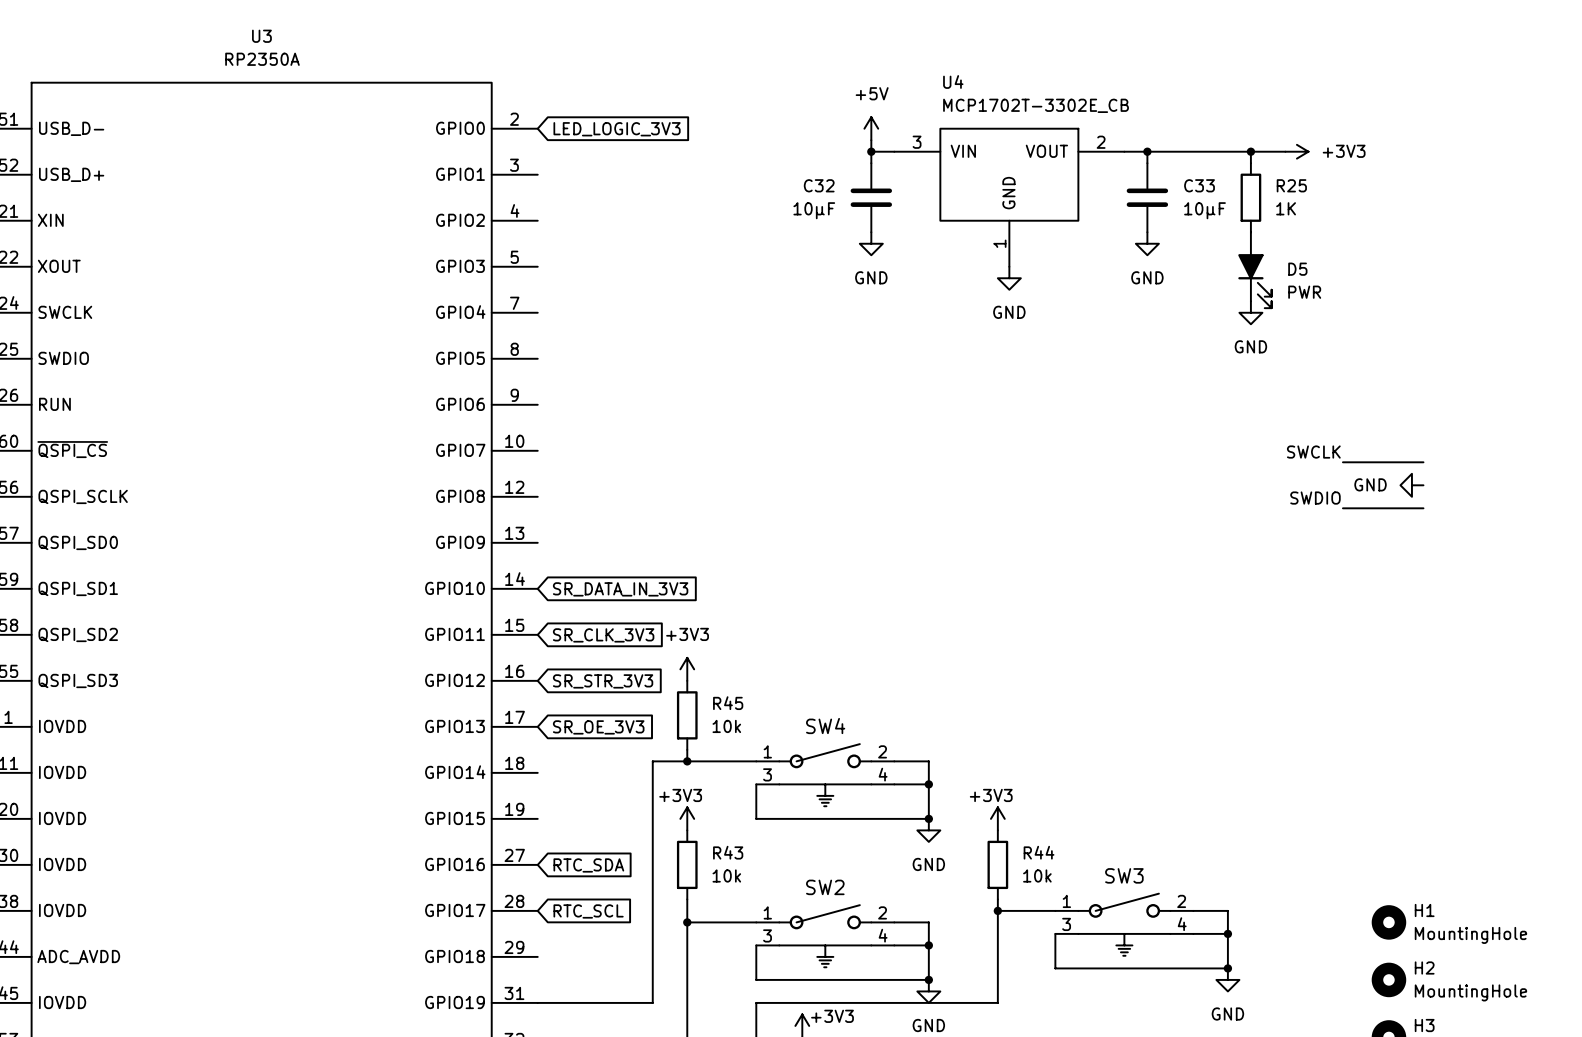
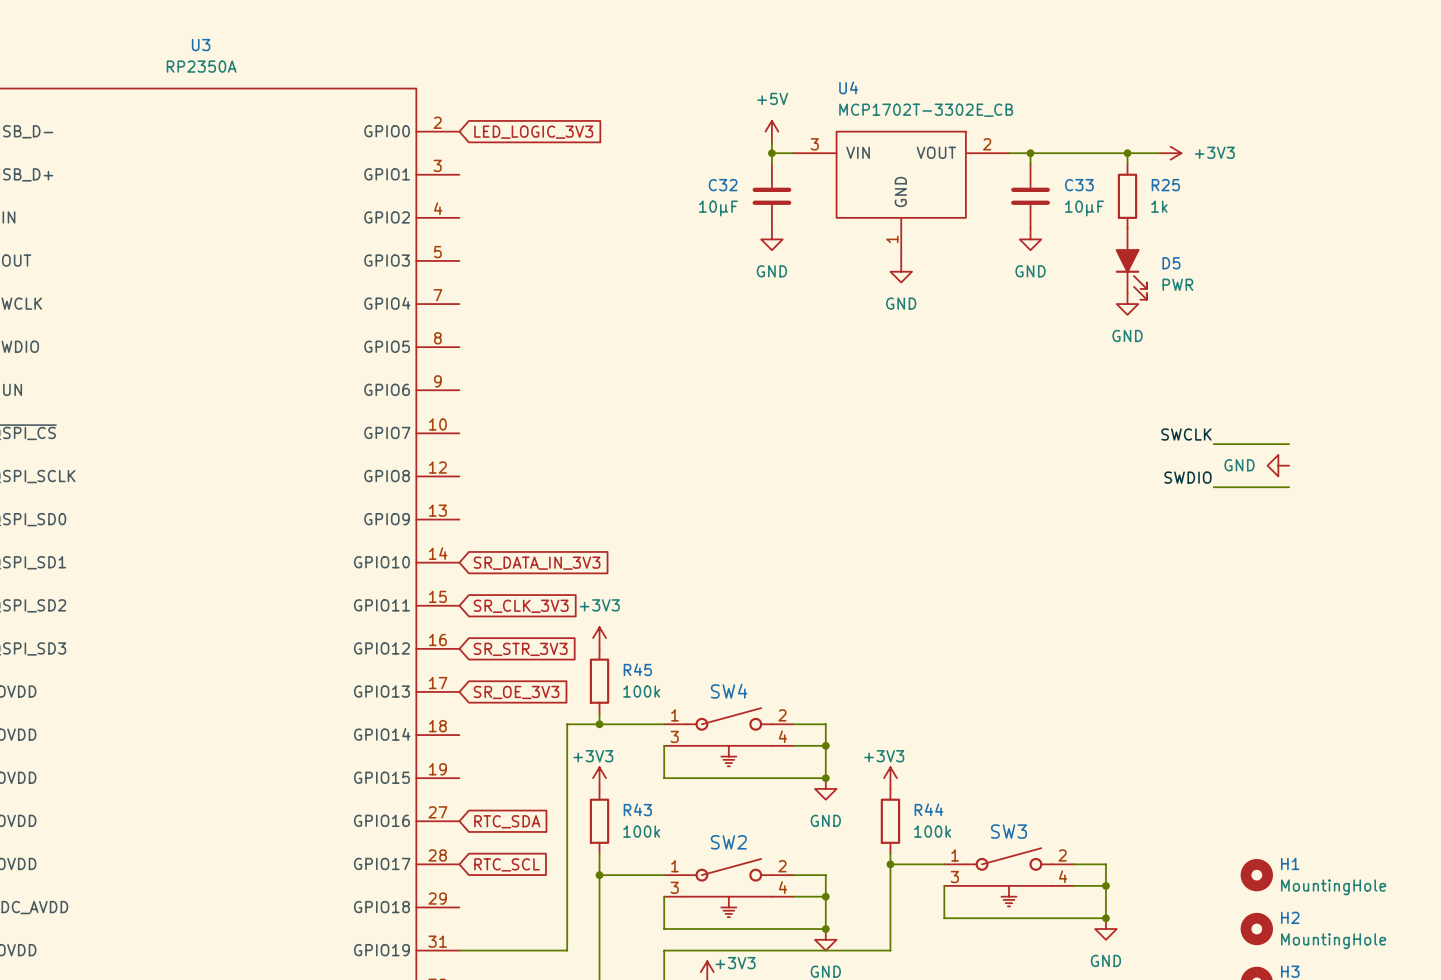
R25 value: 1K (1286, 208) -> 1k (1159, 206)
R45 value: 10k (726, 726) -> 100k (641, 691)
R43 value: 10k (726, 875) -> 100k (641, 831)
R44 value: 10k (1037, 875) -> 100k (932, 831)

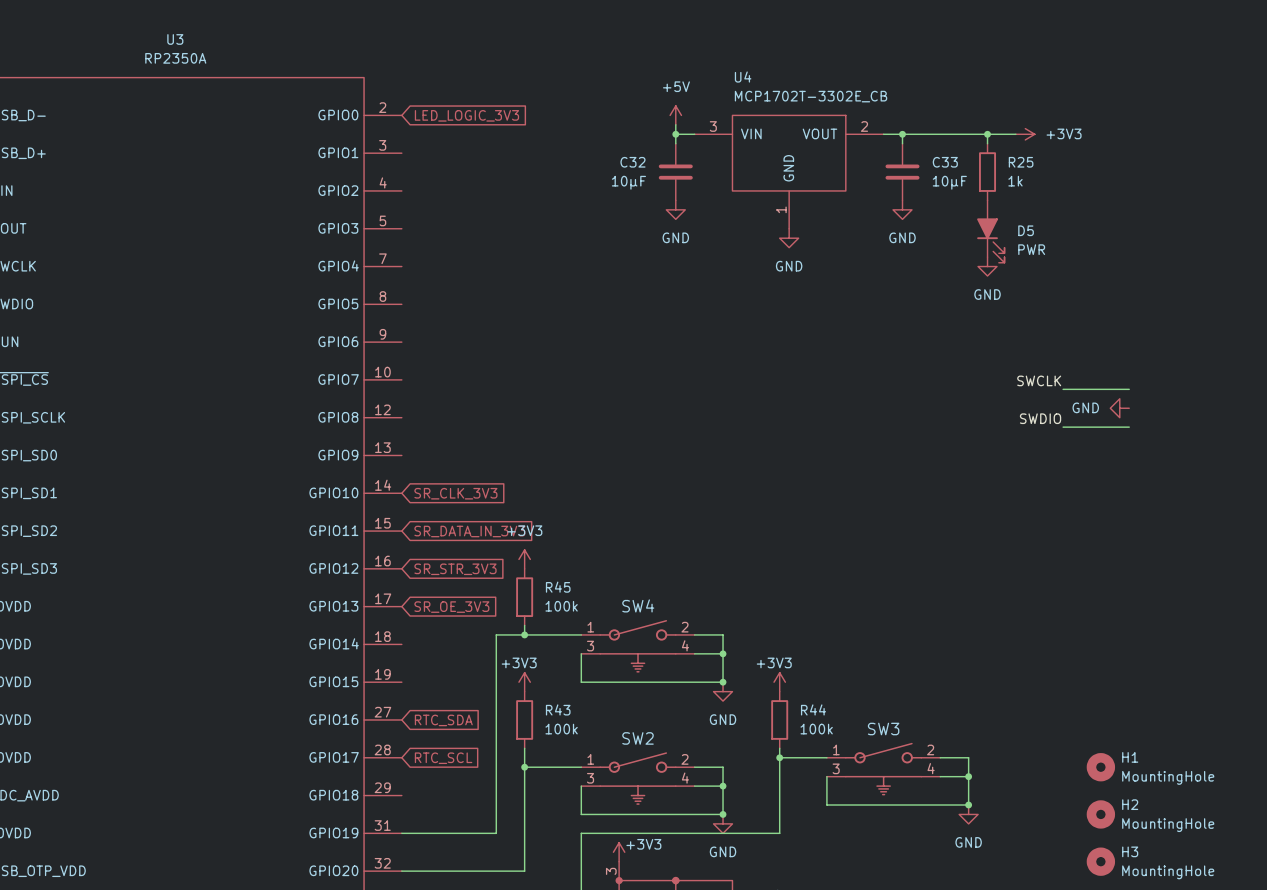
global label: SR_DATA_IN_3V3 (537, 563) -> SR_CLK_3V3 (455, 493)
global label: SR_CLK_3V3 (521, 606) -> SR_DATA_IN_3V3 (469, 531)

